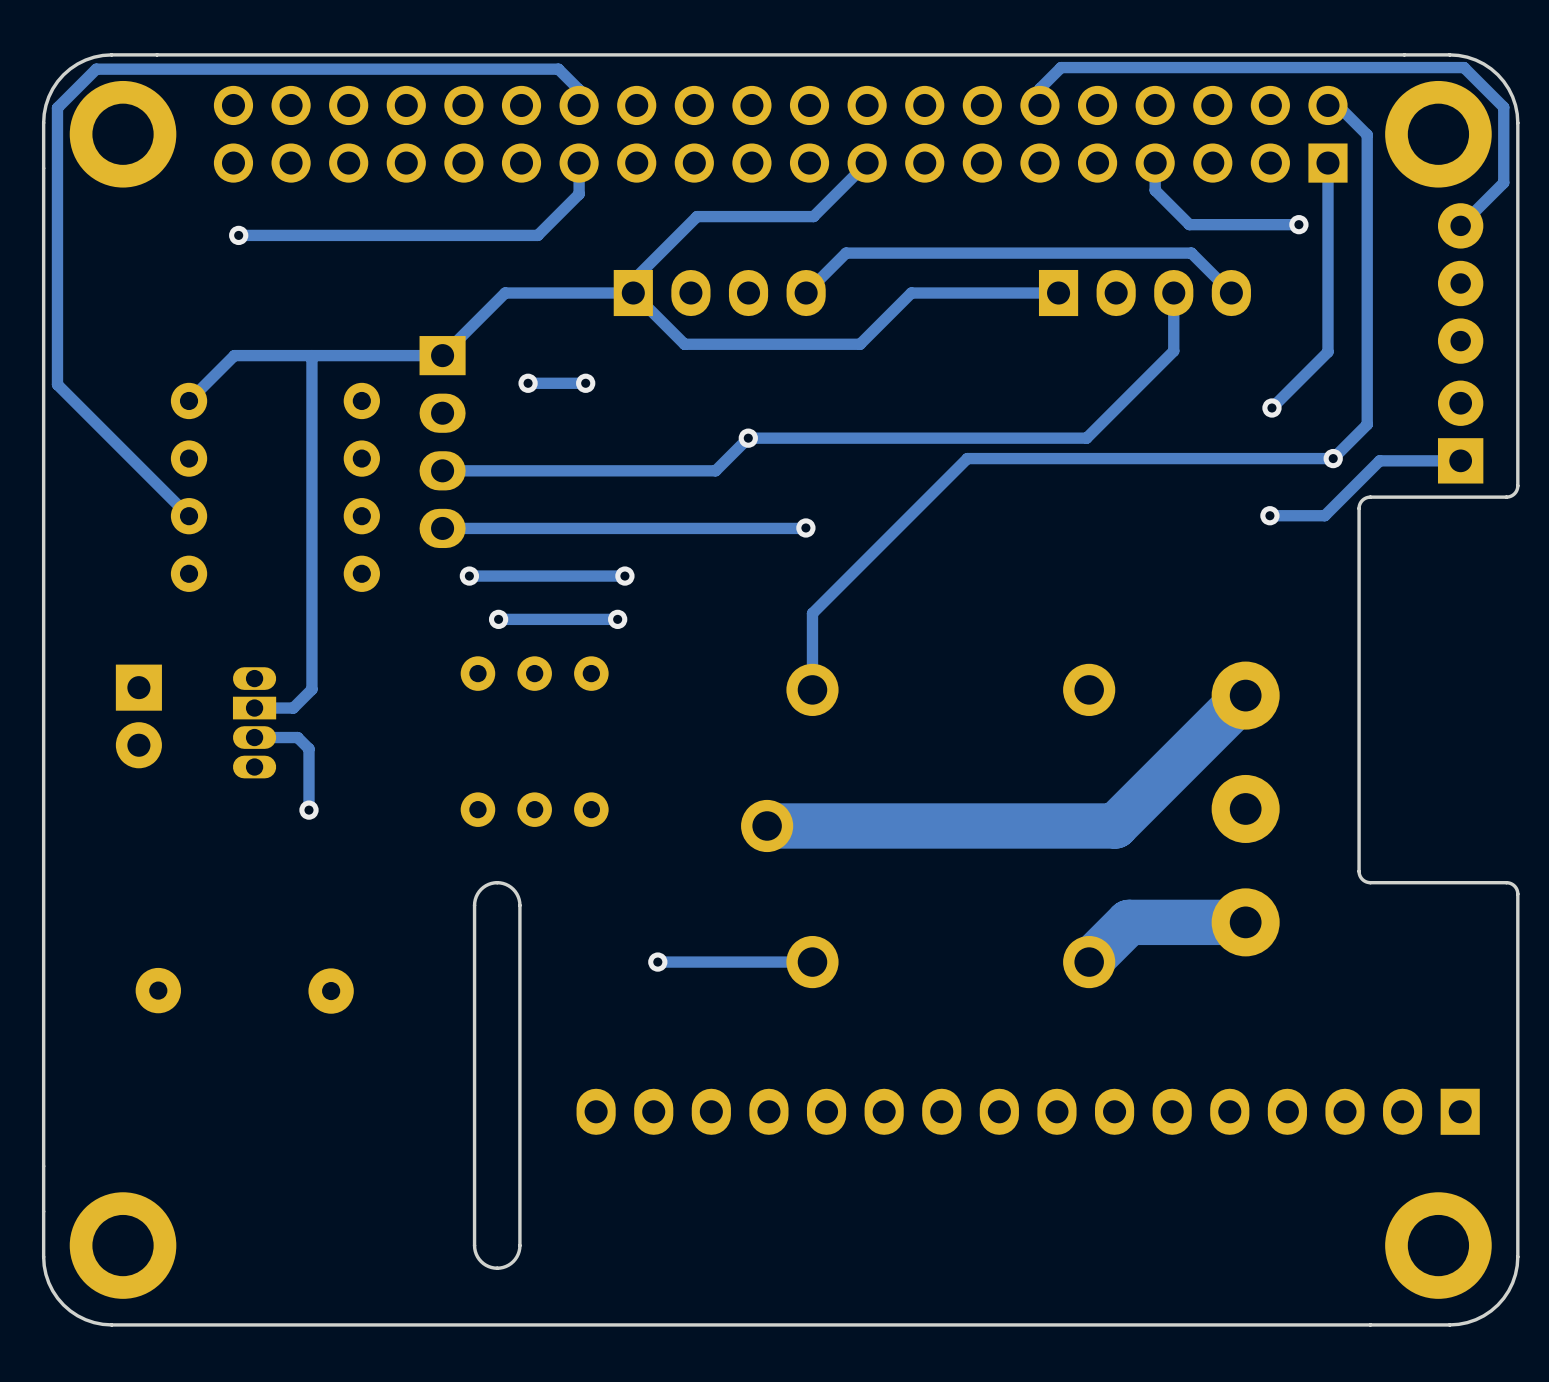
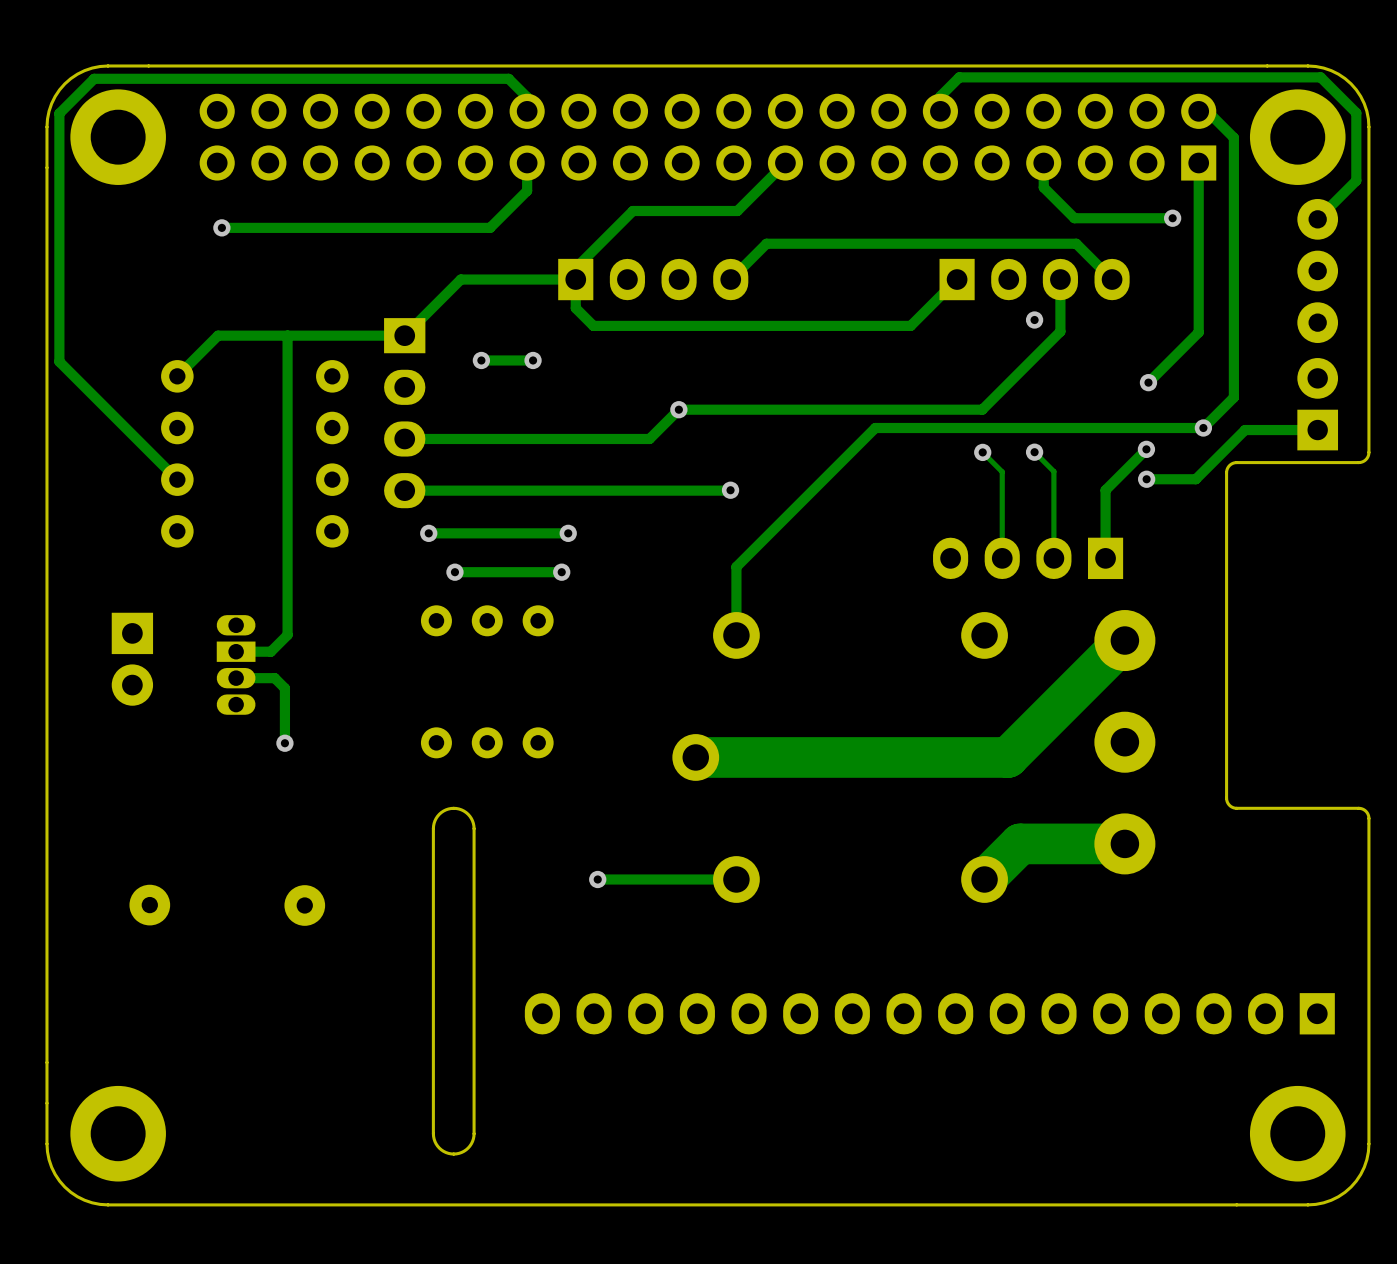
track: (1058, 293) (911, 293) (860, 344) (684, 344) (633, 293) -> (957, 279) (910, 325) (593, 325) (575, 308) (575, 279)
via: none -> (1034, 320)
track: none -> (1146, 449) (1105, 490) (1105, 558)
via: none -> (1146, 449)
track: none -> (982, 452) (1002, 471) (1002, 558)
via: none -> (982, 452)
track: none -> (1034, 452) (1053, 471) (1053, 558)
via: none -> (1034, 452)
part: none -> (1028, 558)

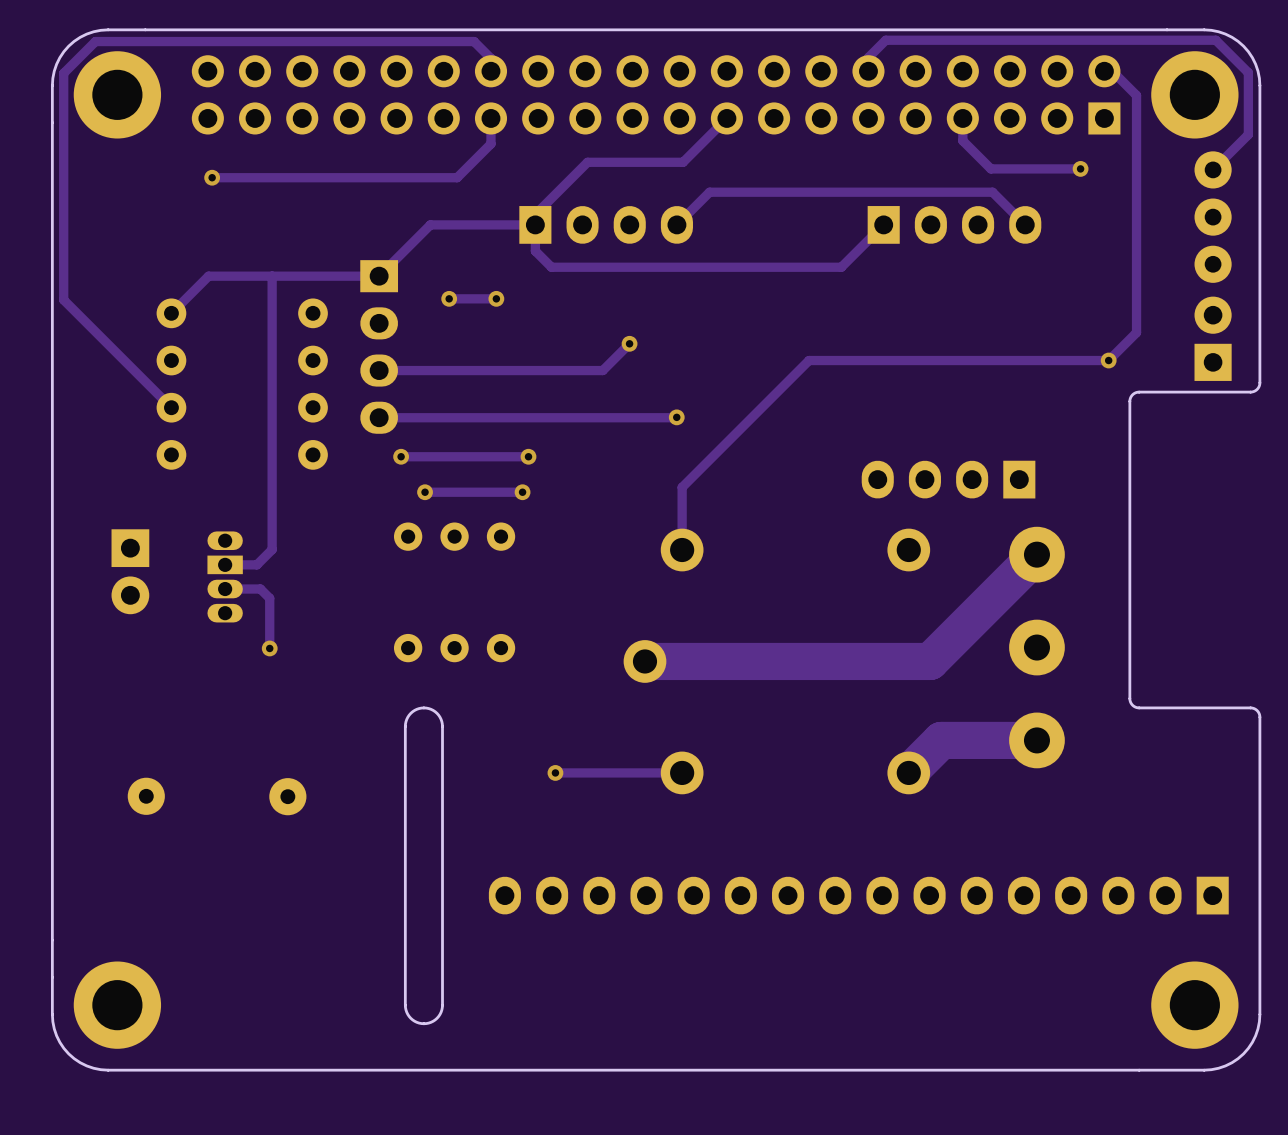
track: (1198, 163) (1198, 332) (1148, 382) -> none
track: (1060, 279) (1060, 331) (982, 409) (678, 409) -> none
via: (1034, 320) -> none
via: (1148, 382) -> none
track: (1317, 430) (1245, 430) (1195, 479) (1146, 479) -> none
track: (1146, 449) (1105, 490) (1105, 558) -> none
via: (1146, 449) -> none
track: (982, 452) (1002, 471) (1002, 558) -> none
via: (982, 452) -> none
track: (1034, 452) (1053, 471) (1053, 558) -> none
via: (1034, 452) -> none
via: (1146, 479) -> none

